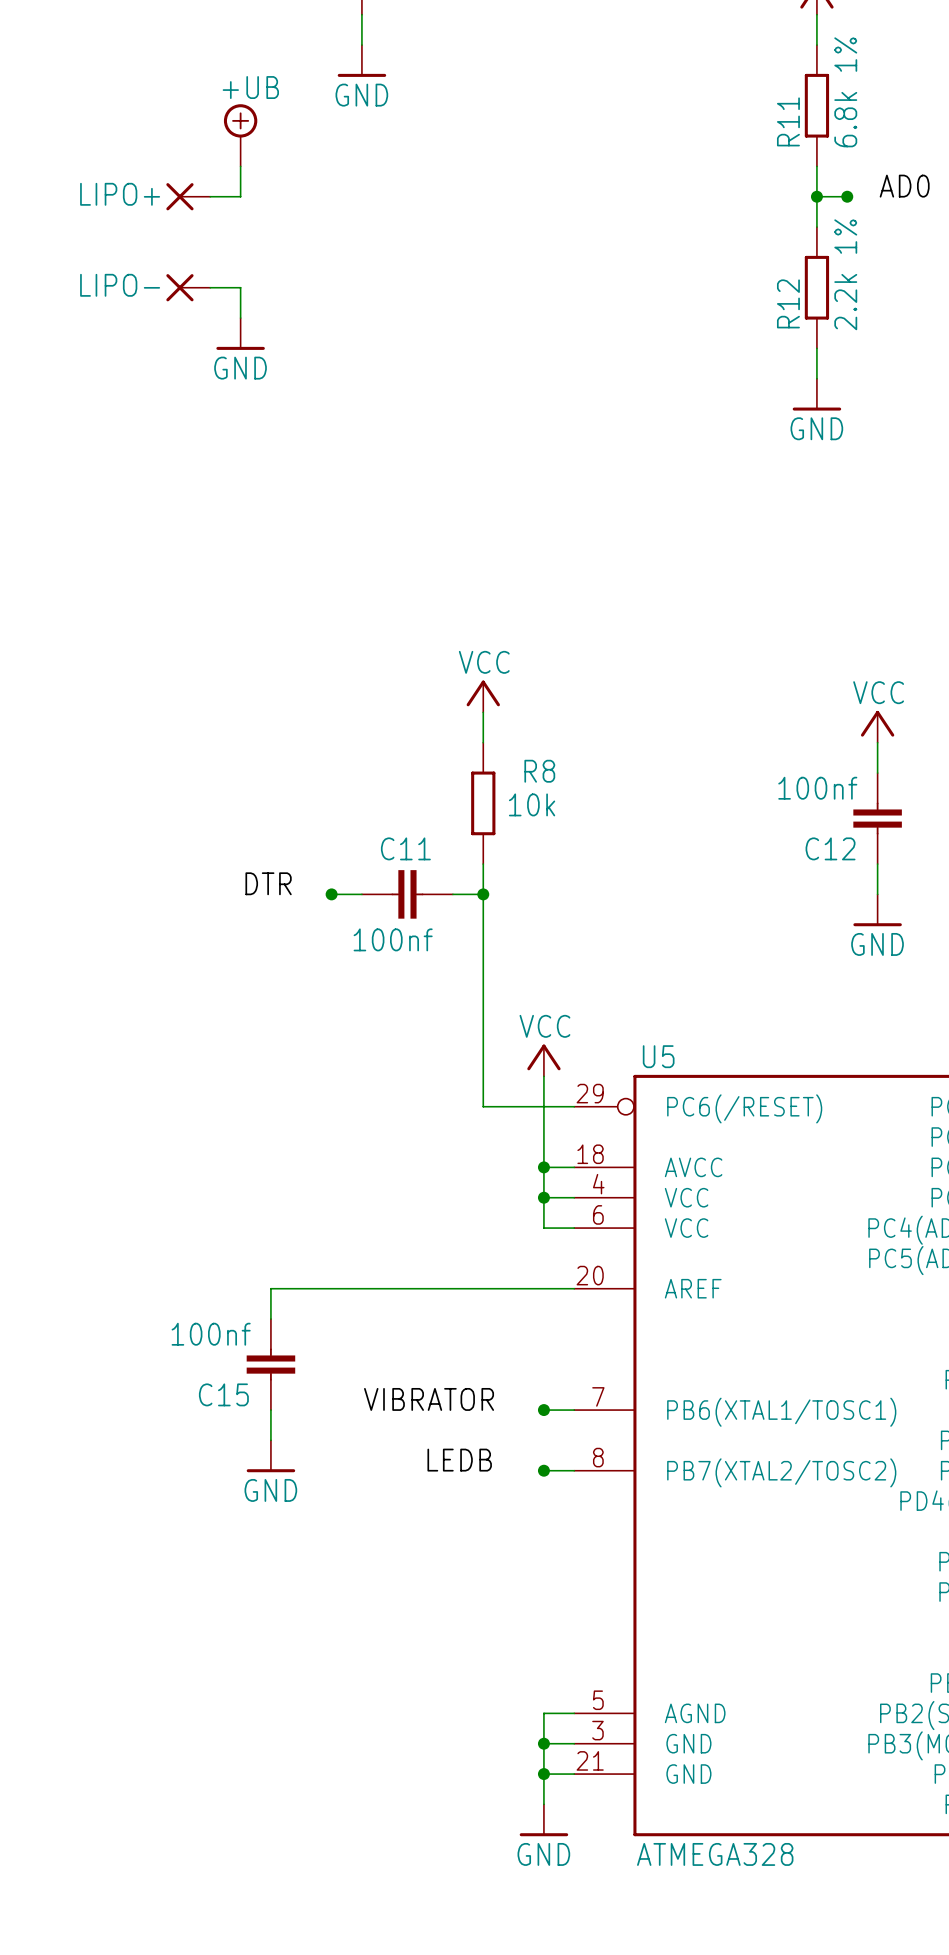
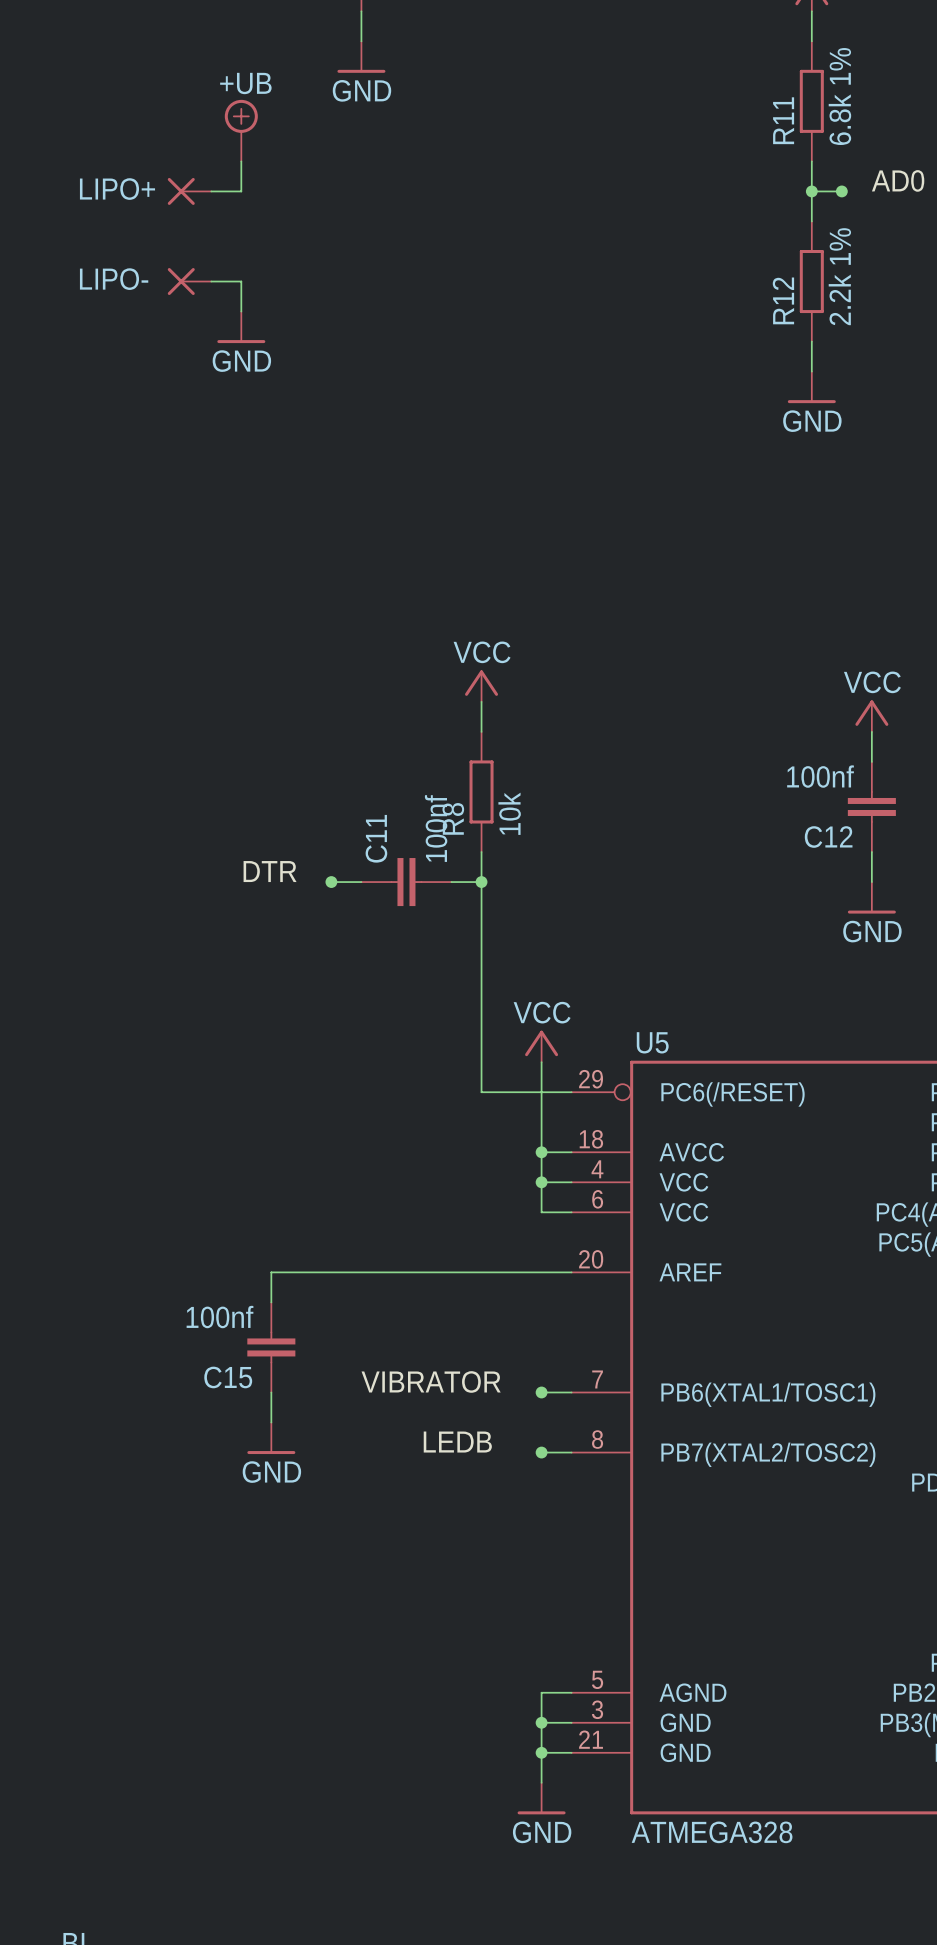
R8 name rotation: 0° (539, 771) -> 90° counterclockwise (453, 818)
R8 name position: R8 (539, 771) -> R8 (453, 818)
R8 value rotation: 0° (532, 804) -> 90° counterclockwise (509, 813)
C11 name rotation: 0° (405, 848) -> 90° counterclockwise (376, 838)
C11 value rotation: 0° (393, 939) -> 90° counterclockwise (436, 828)
C11 value position: 100nf (393, 939) -> 100nf (436, 828)

